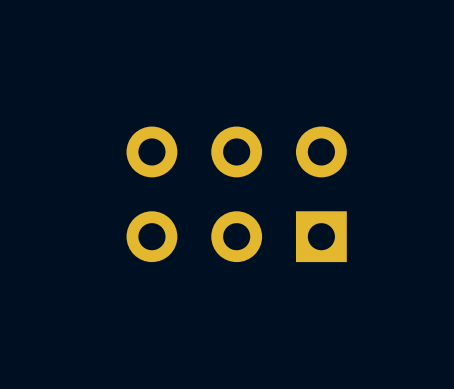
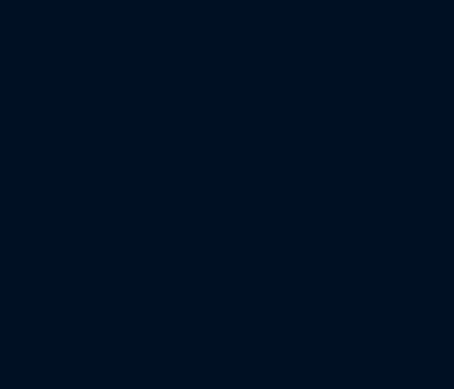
part: (236, 194) -> none

